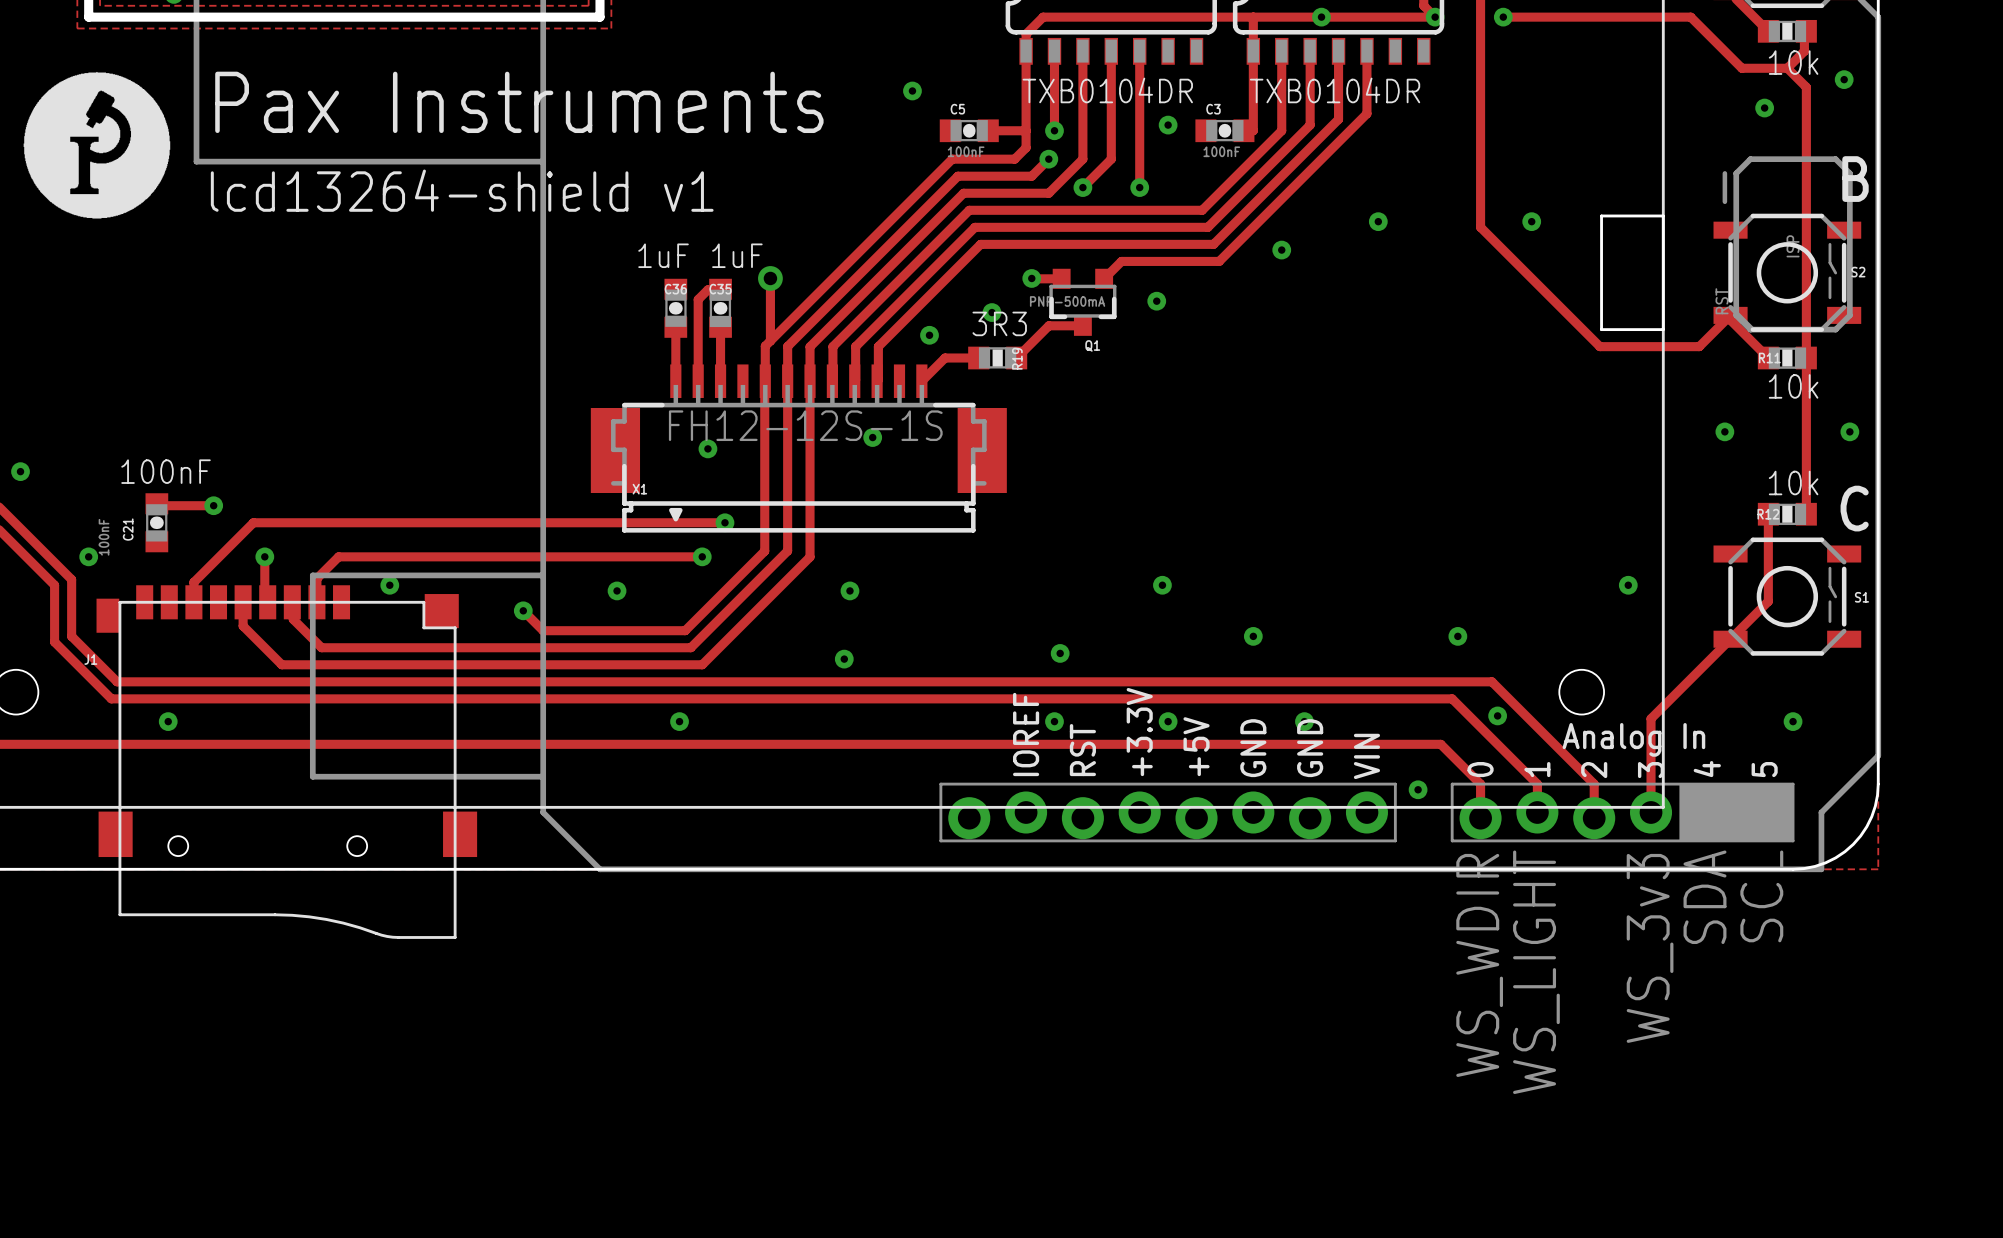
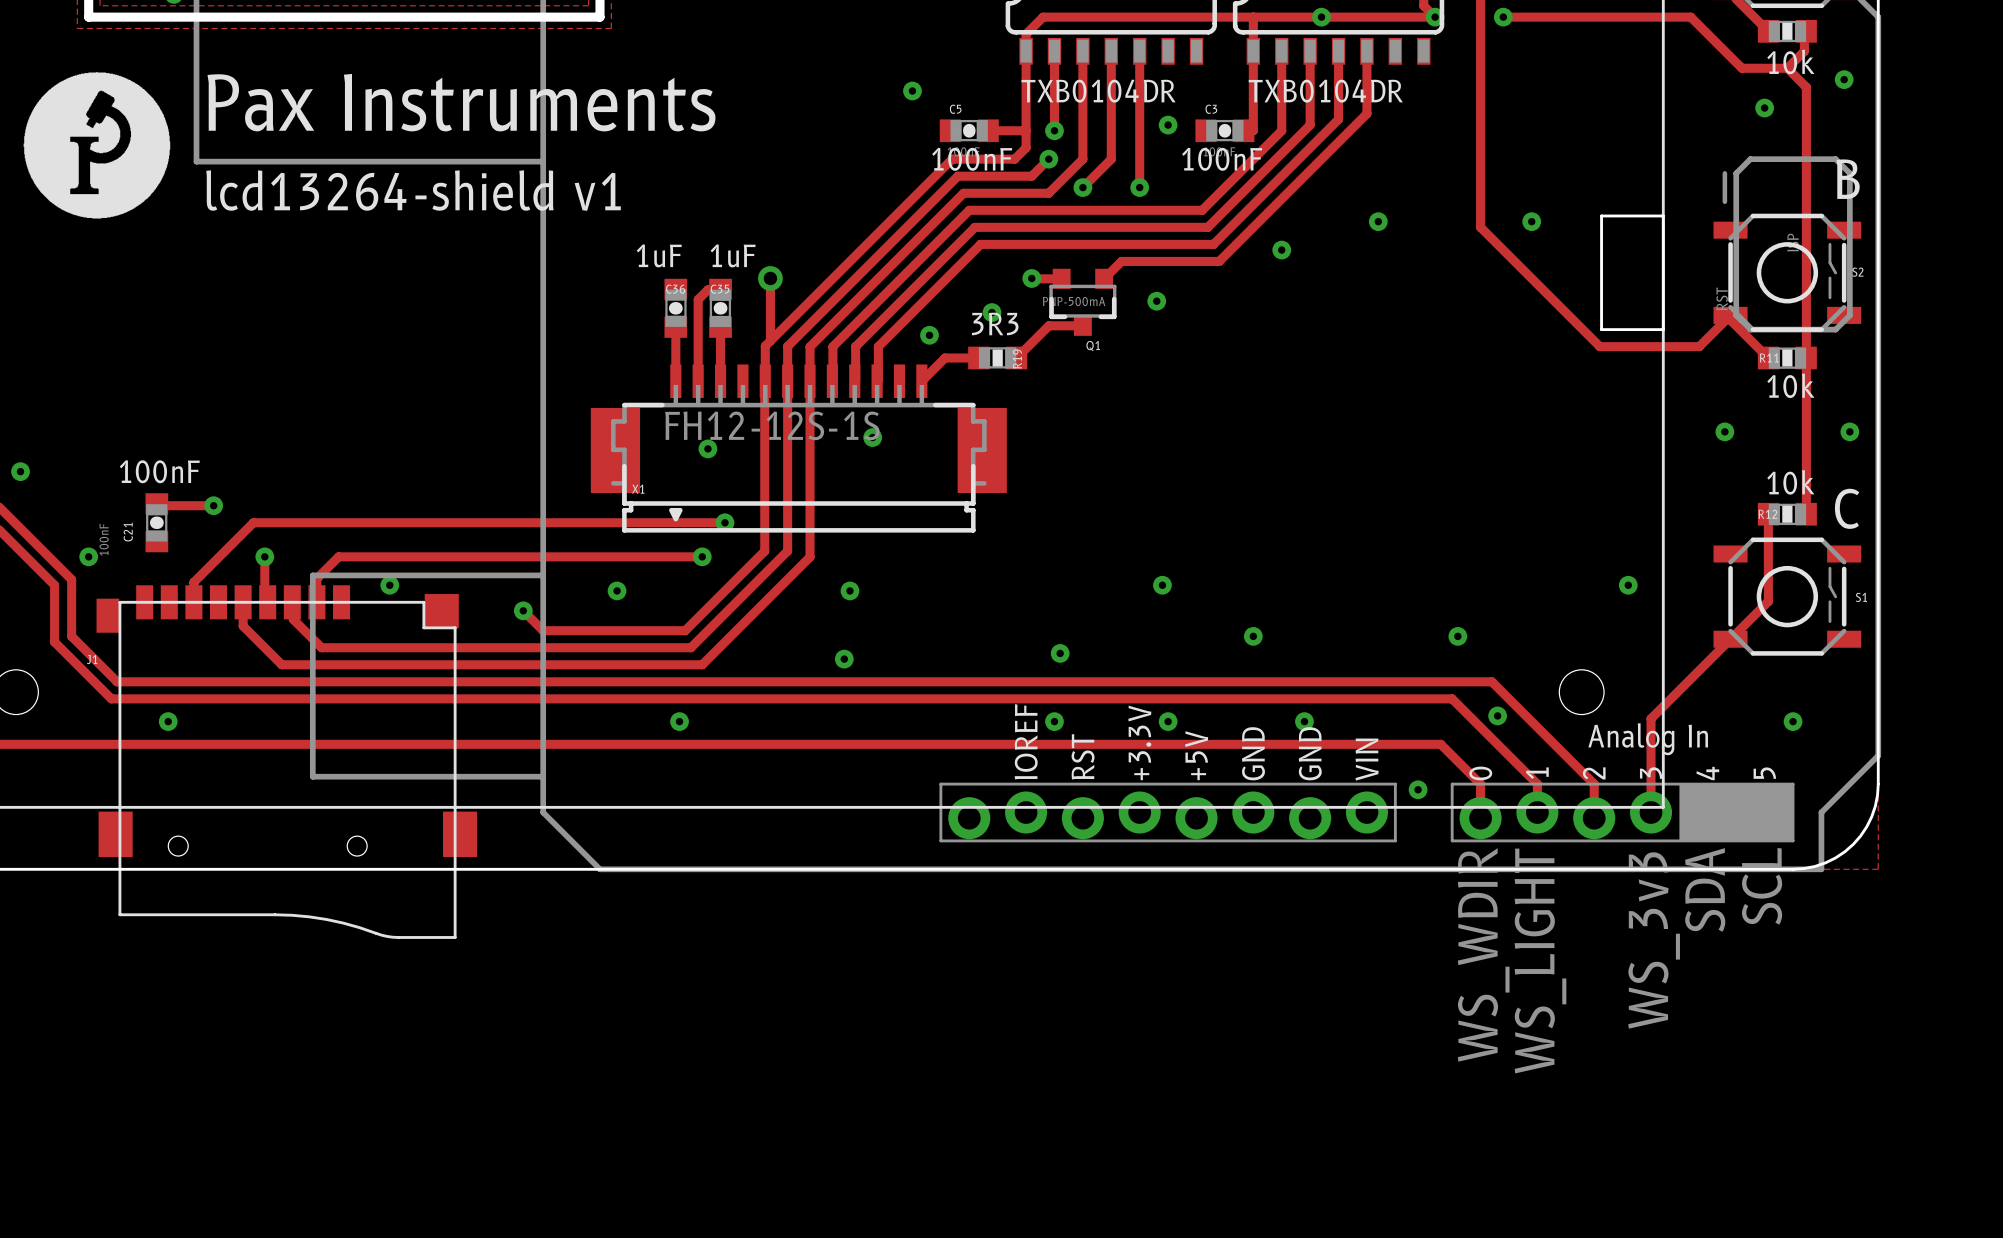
text: none -> 100nF (972, 159)
text: none -> 100nF (1222, 159)

